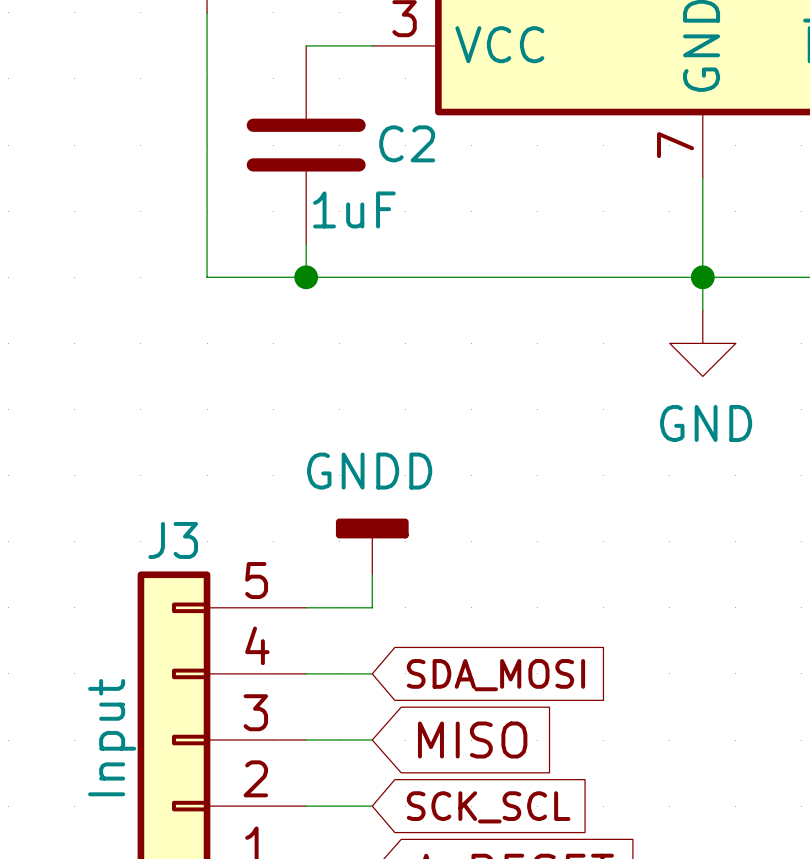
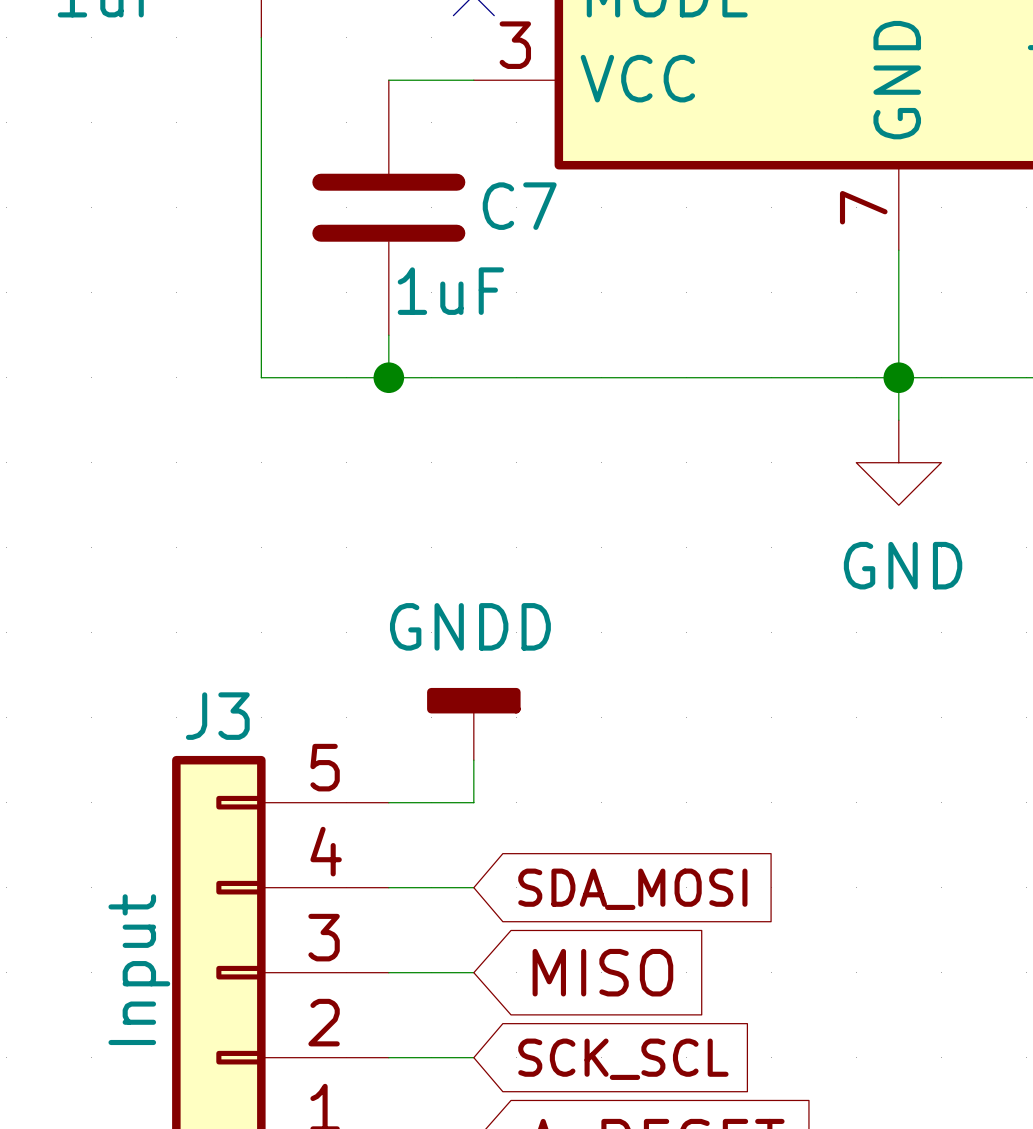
C2 name: C2 (407, 143) -> C7 (519, 206)

